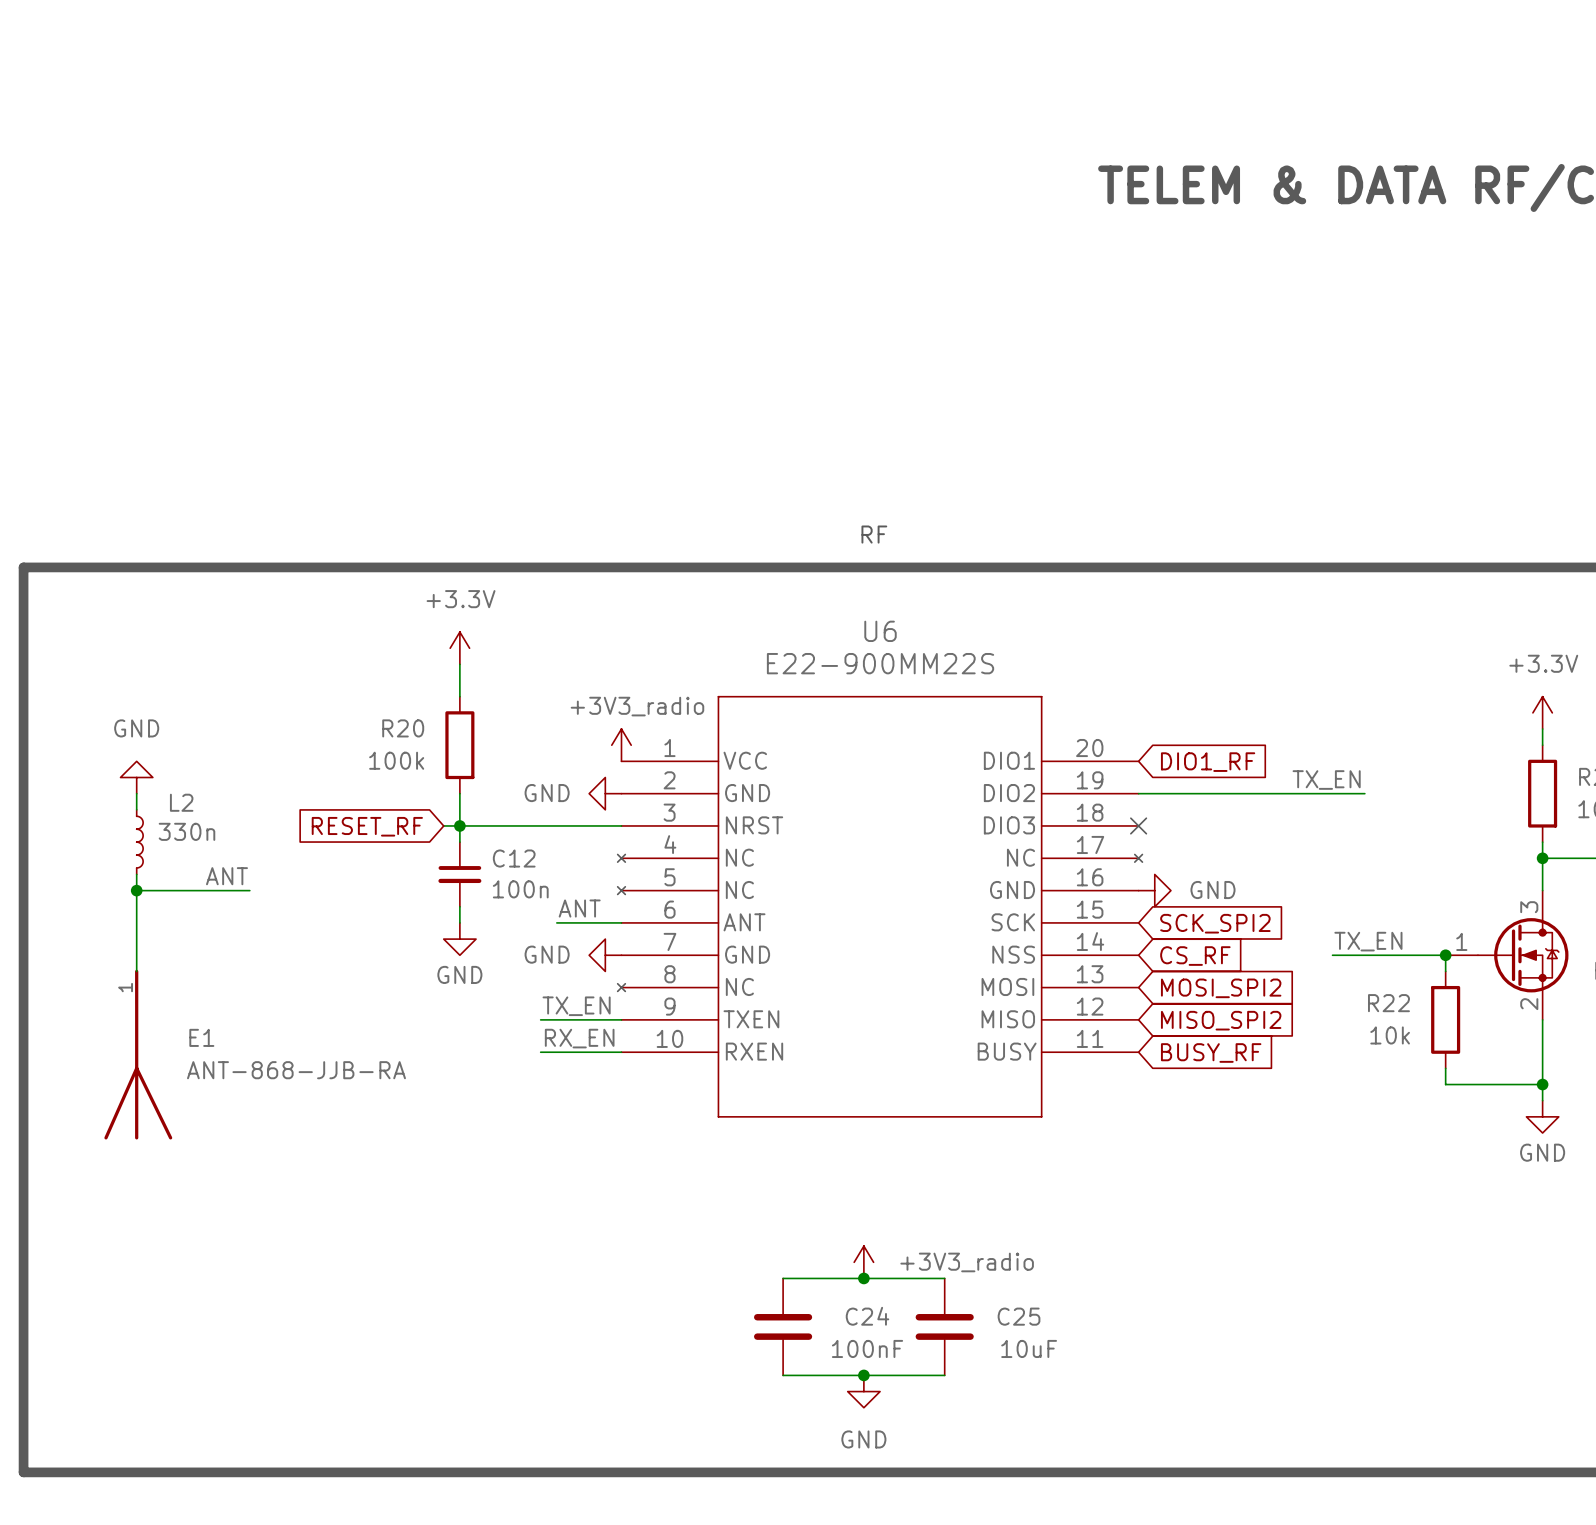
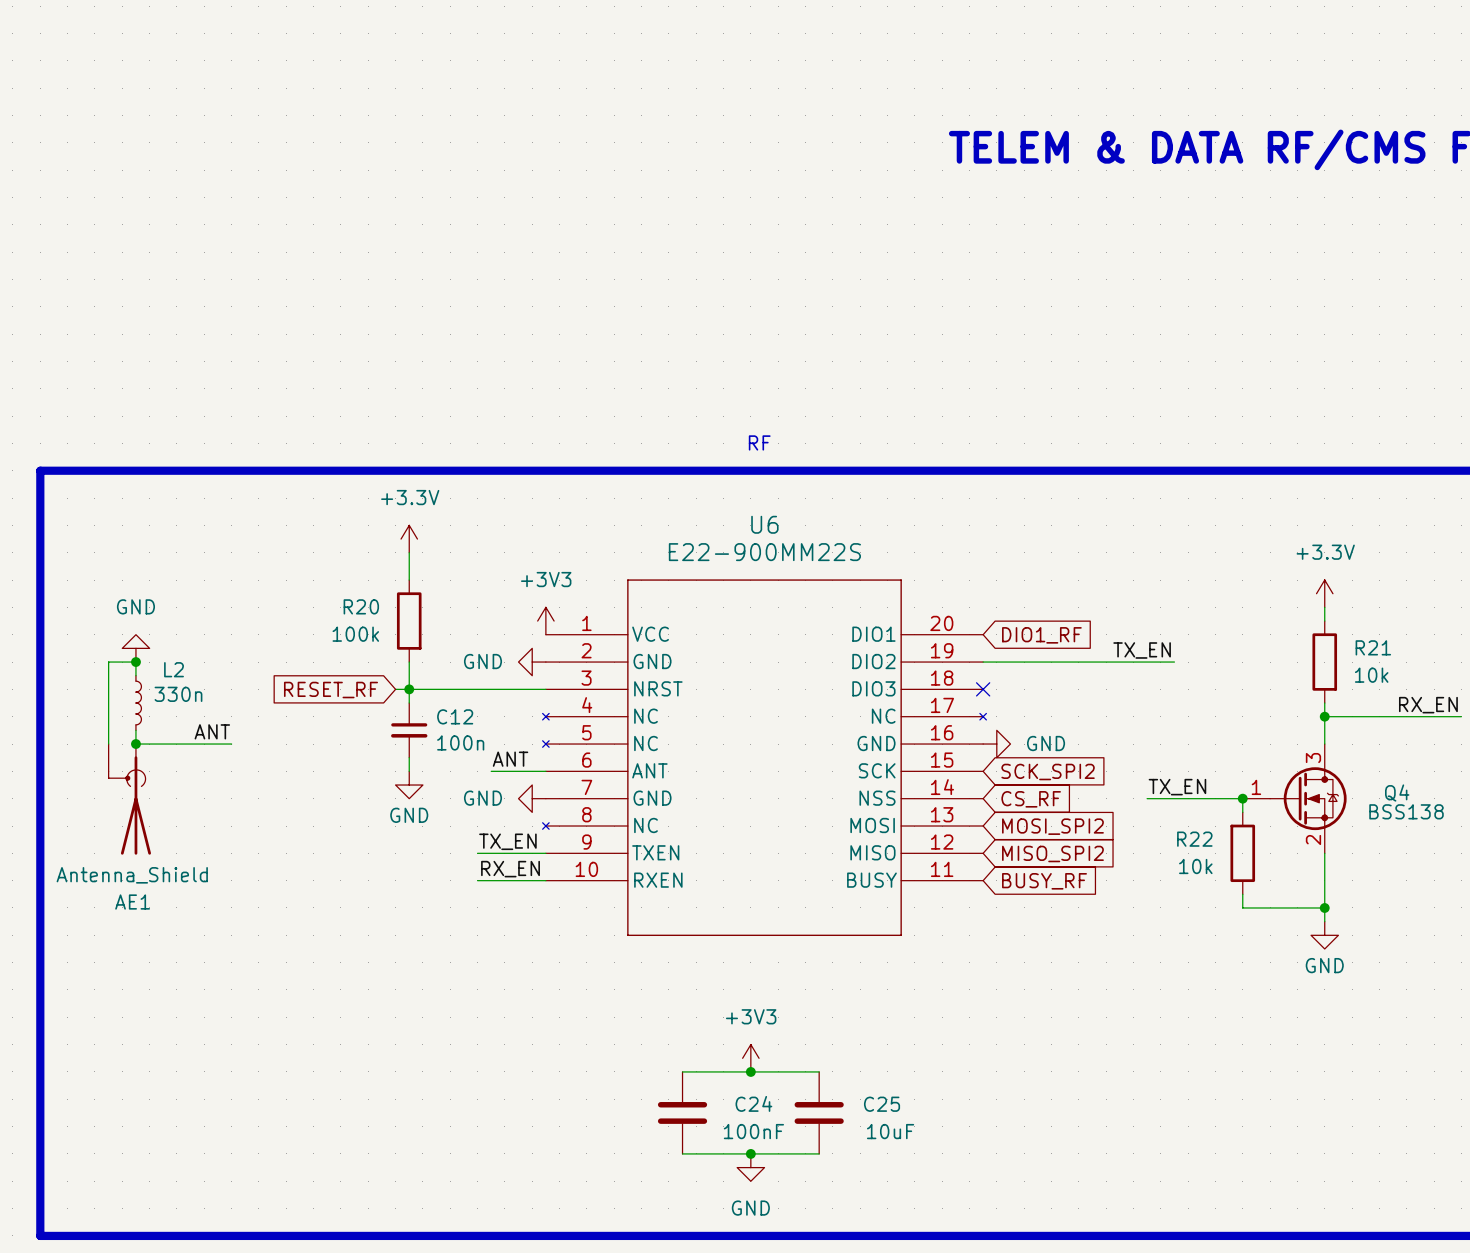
power symbol: +3V3_radio (621, 745) -> +3V3 (545, 621)
wire: none -> (135, 662) (108, 662) (108, 744)
junction: none -> (135, 662)
AE1: none -> Antenna_Shield (129, 799)
E1: ANT-868-JJB-RA (138, 1054) -> none
power symbol: +3V3_radio (863, 1262) -> +3V3 (750, 1058)

